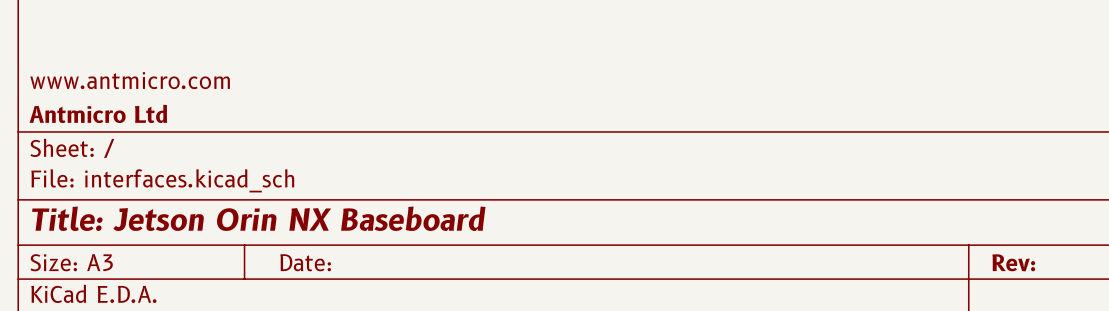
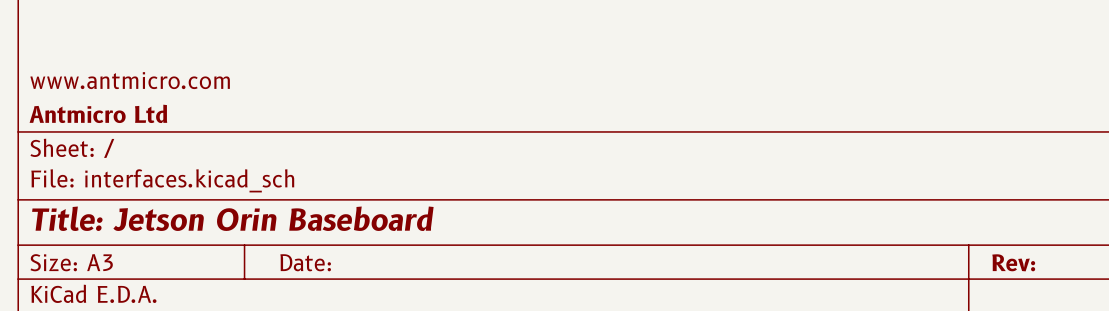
title block: Title: Jetson Orin NX Baseboard (258, 218) -> Title: Jetson Orin Baseboard (232, 218)

